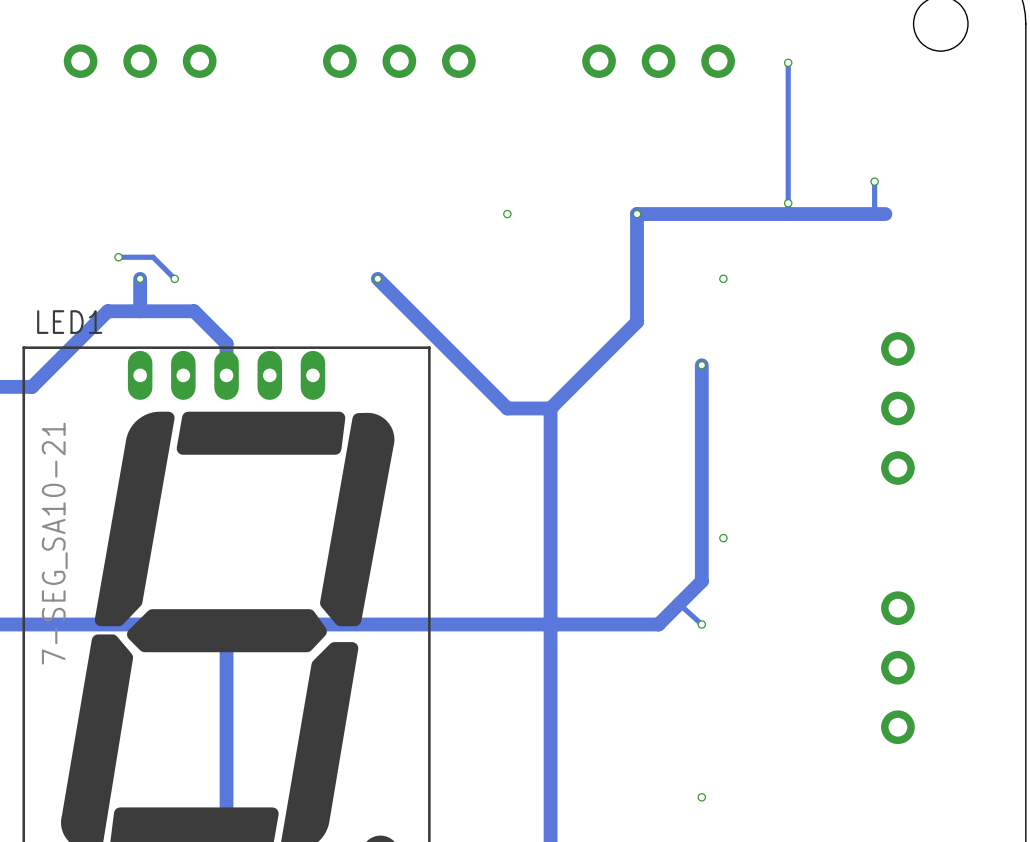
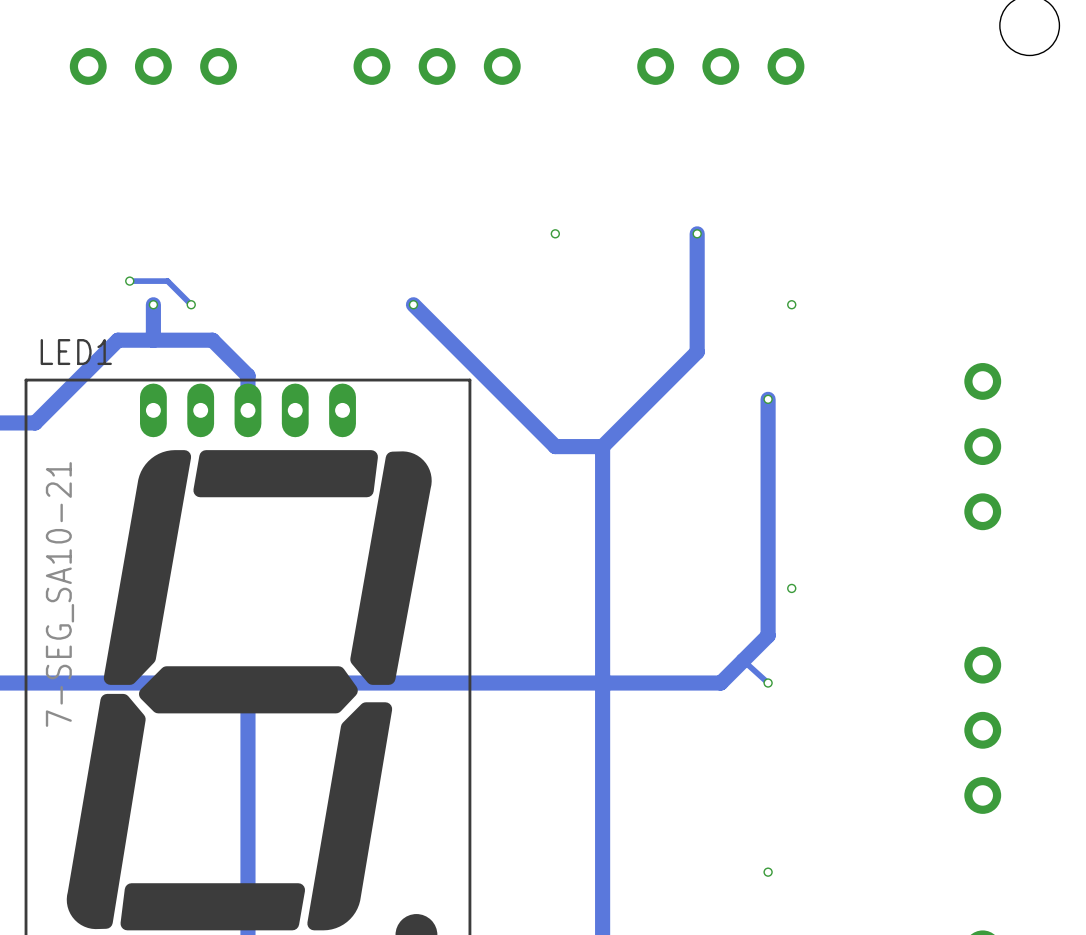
track: (788, 62) (788, 214) -> none
via: (788, 62) -> none
track: (874, 181) (874, 214) -> none
via: (874, 181) -> none
via: (788, 203) -> none
track: (885, 214) (636, 214) -> none

